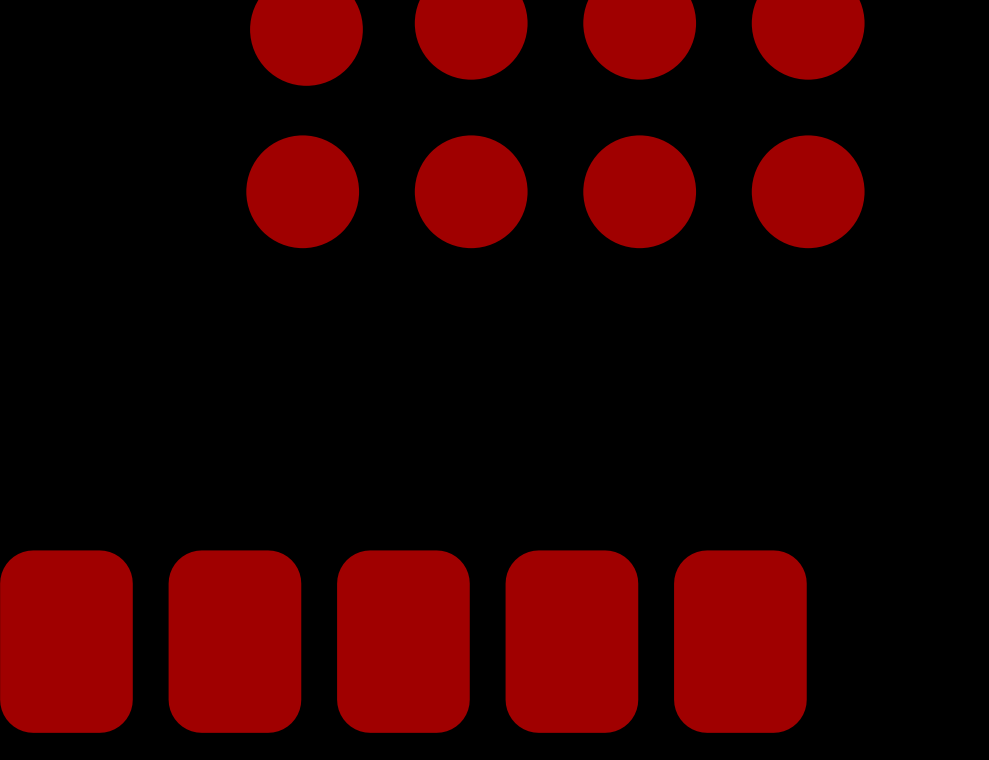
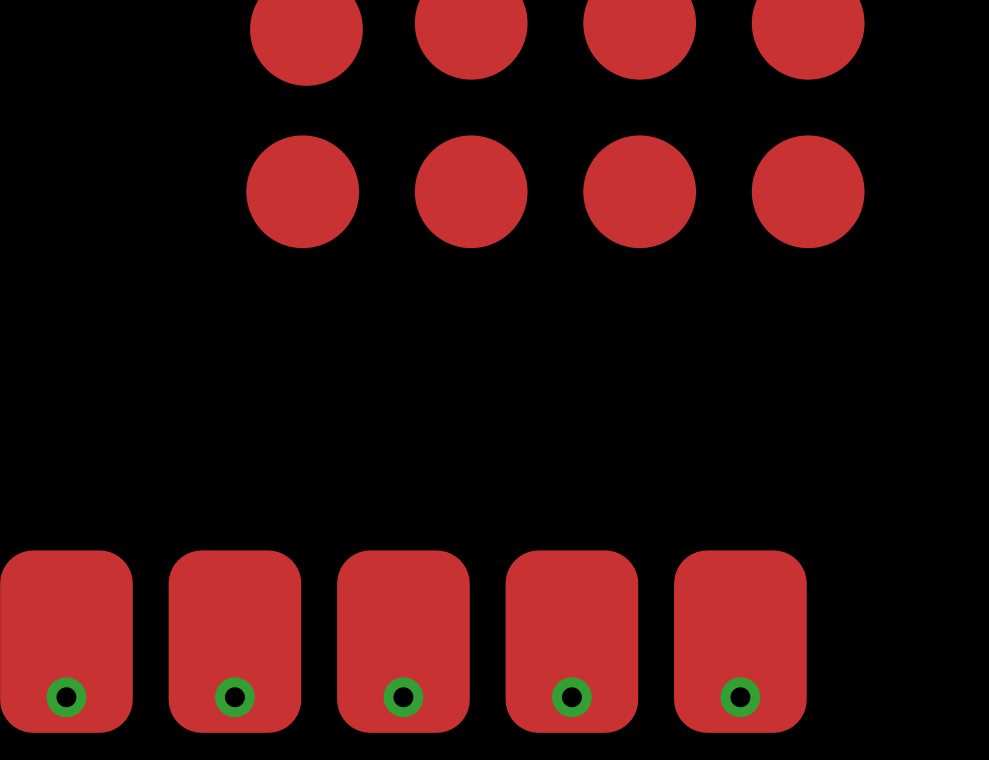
via: none -> (66, 697)
via: none -> (234, 697)
via: none -> (403, 697)
via: none -> (571, 697)
via: none -> (740, 697)

